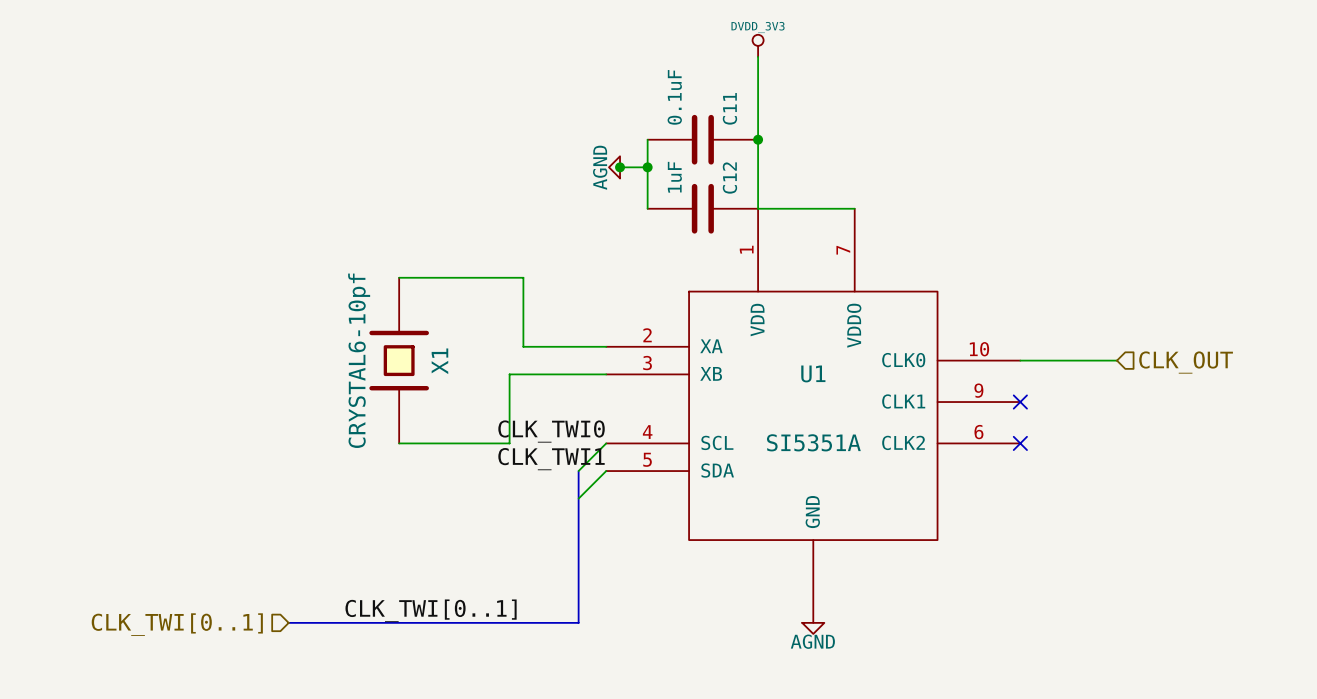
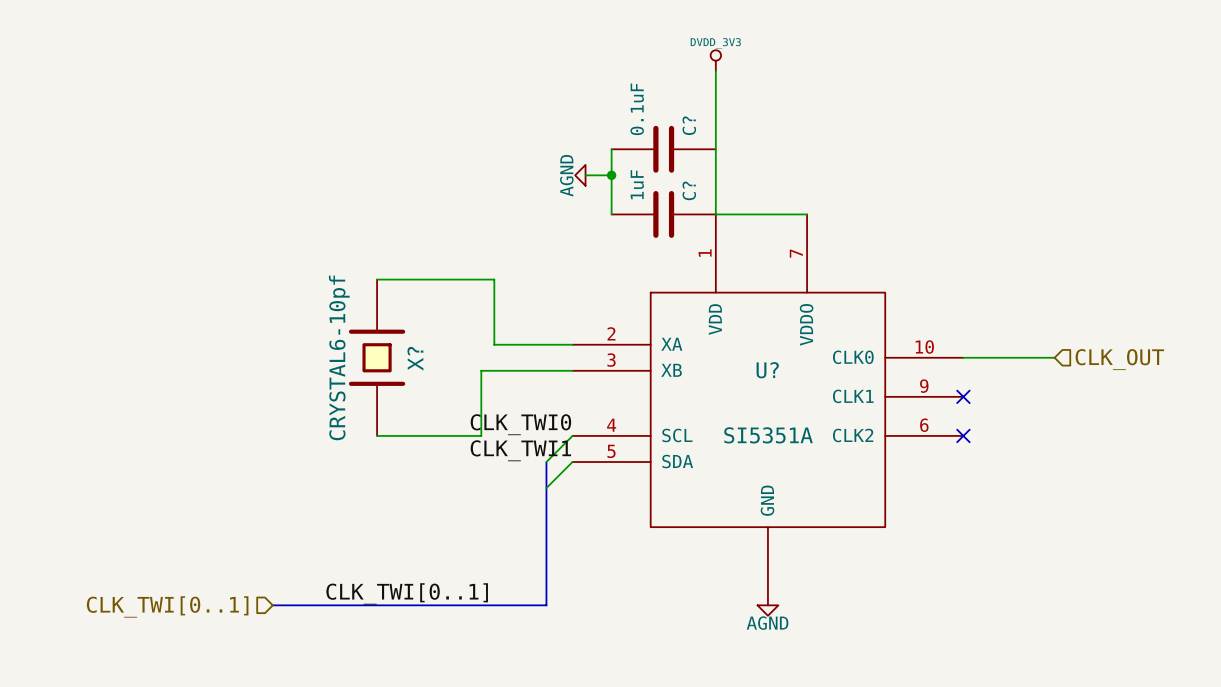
C11 name: C11 (729, 108) -> C? (689, 125)
junction: (758, 139) -> none
junction: (620, 167) -> none
C12 name: C12 (729, 178) -> C? (689, 190)
X1 name: X1 (439, 361) -> X? (415, 358)
U1 name: U1 (813, 373) -> U? (767, 370)

